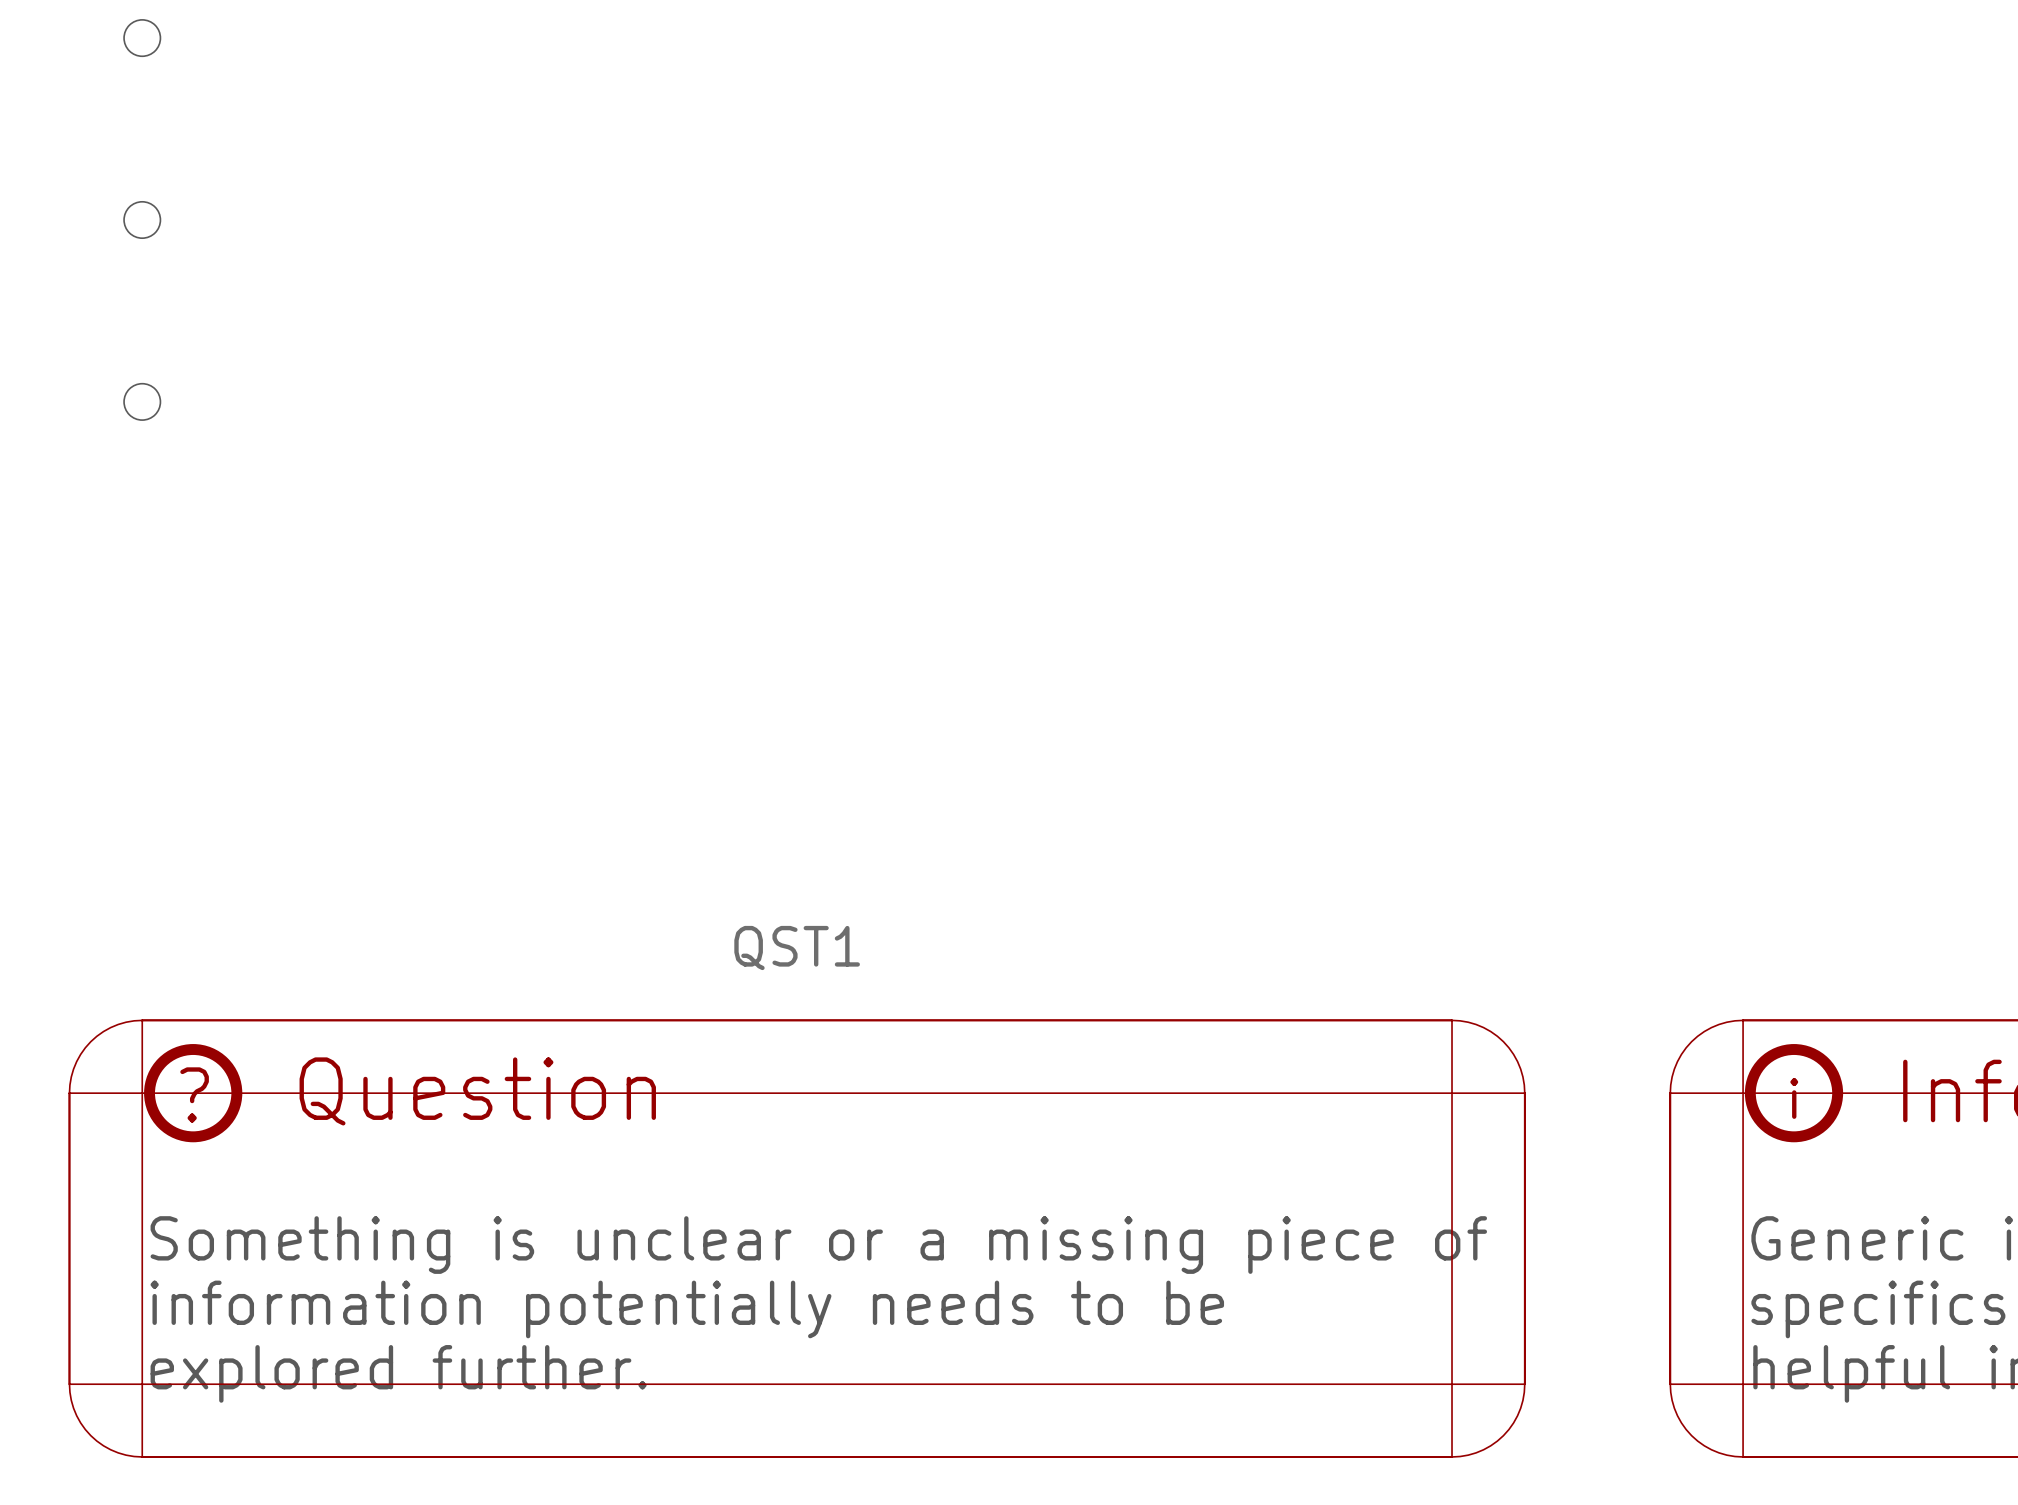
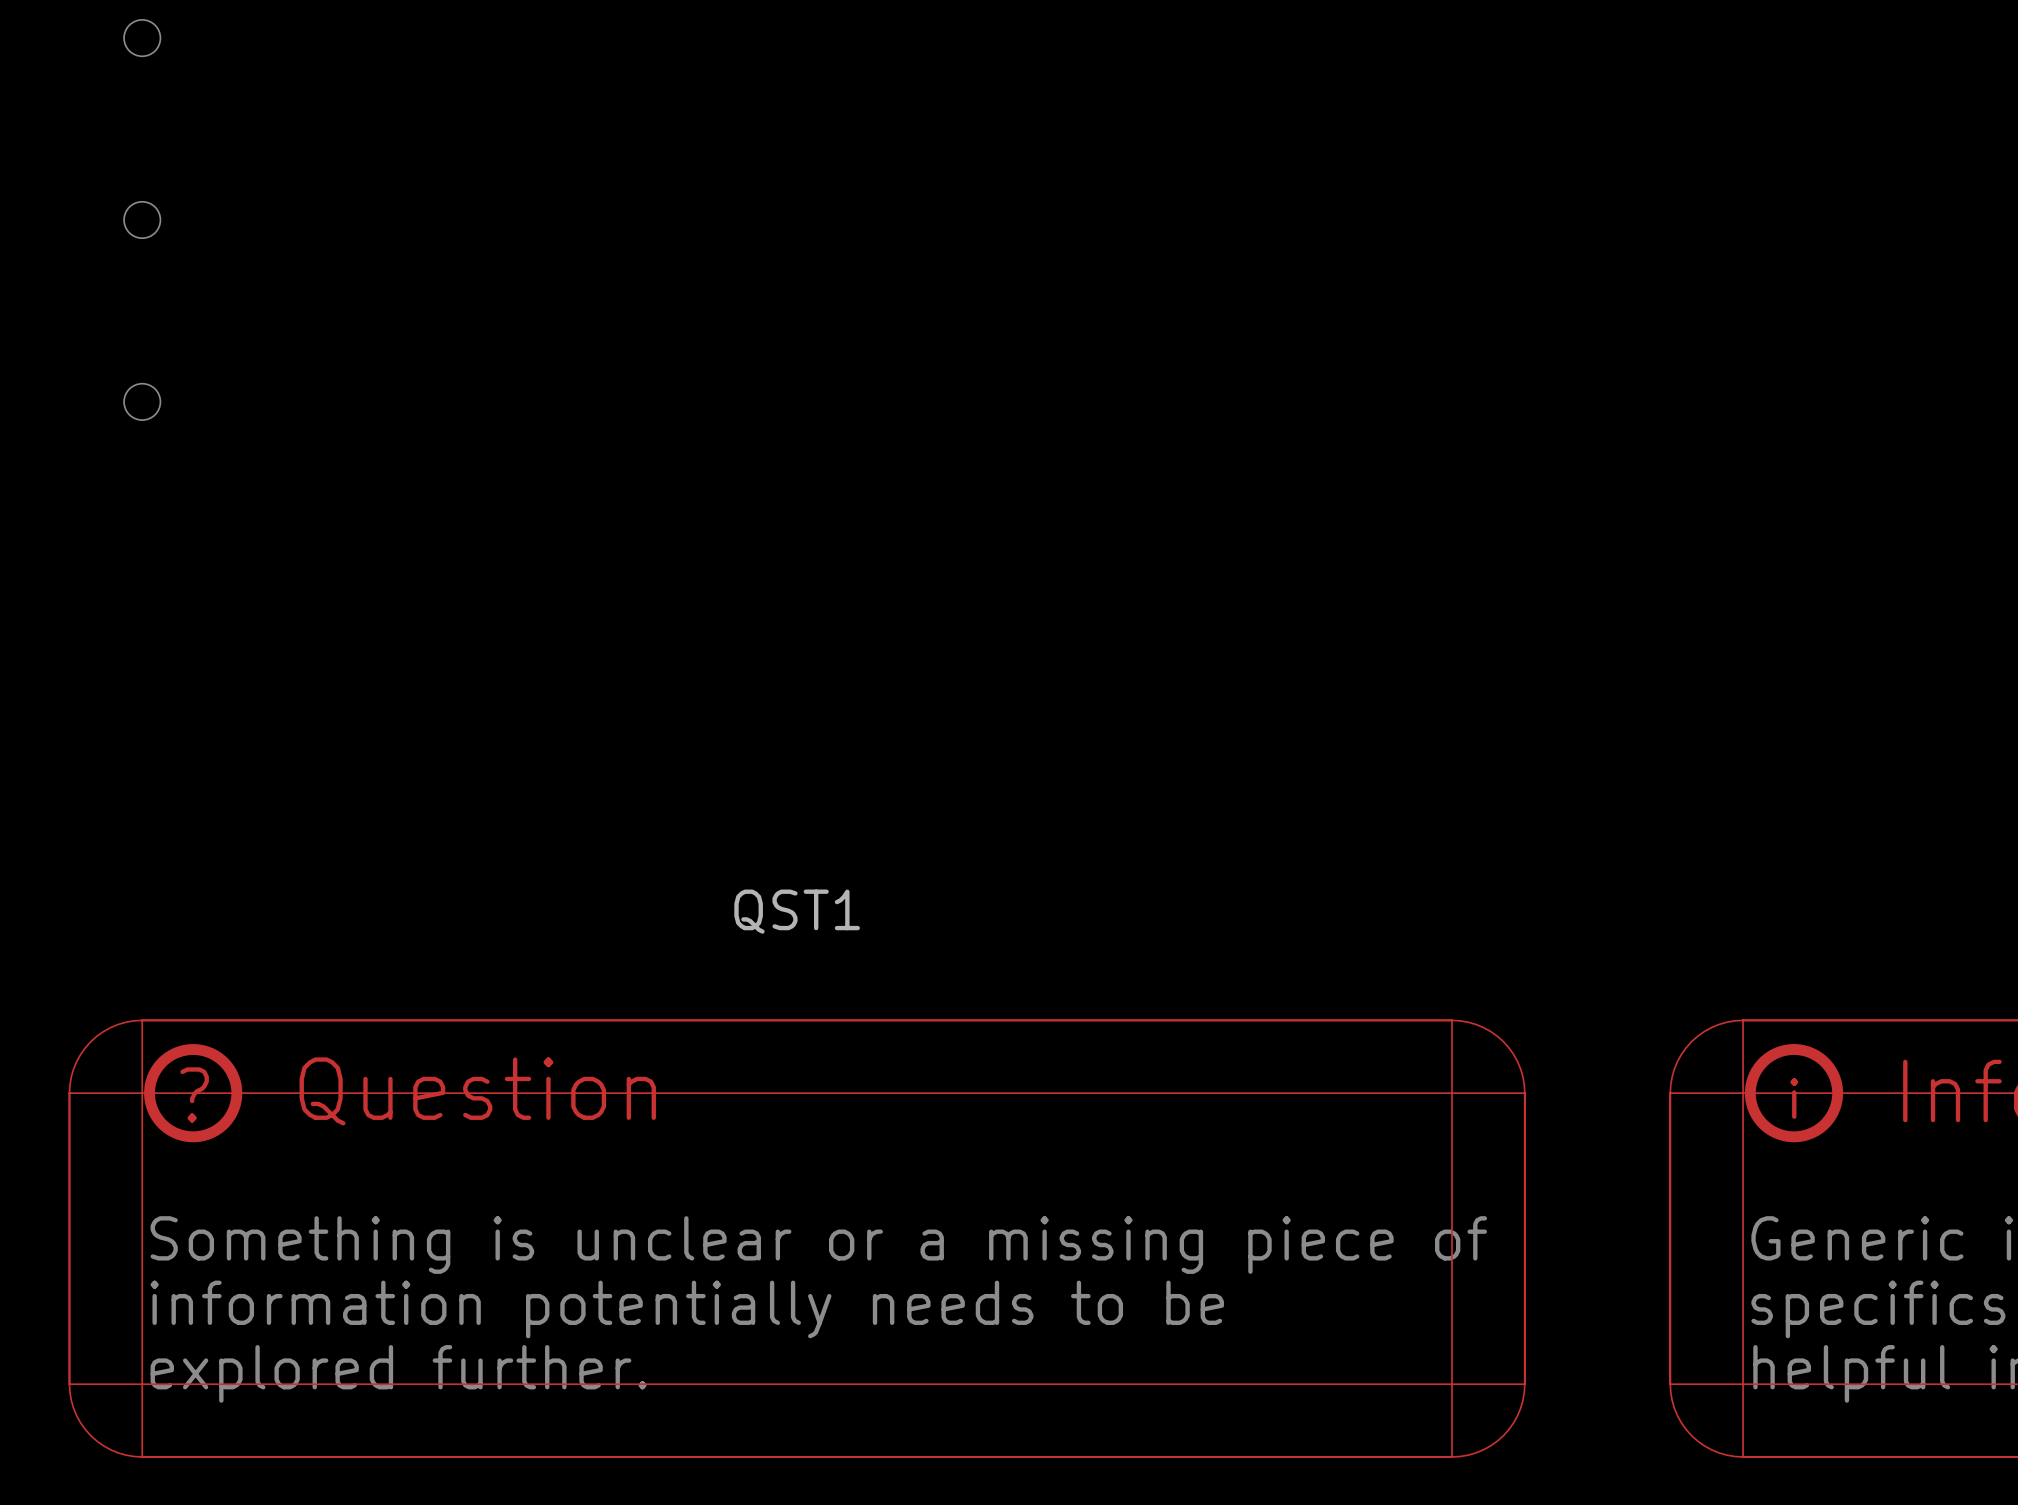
QST1 name position: QST1 (797, 948) -> QST1 (797, 911)

